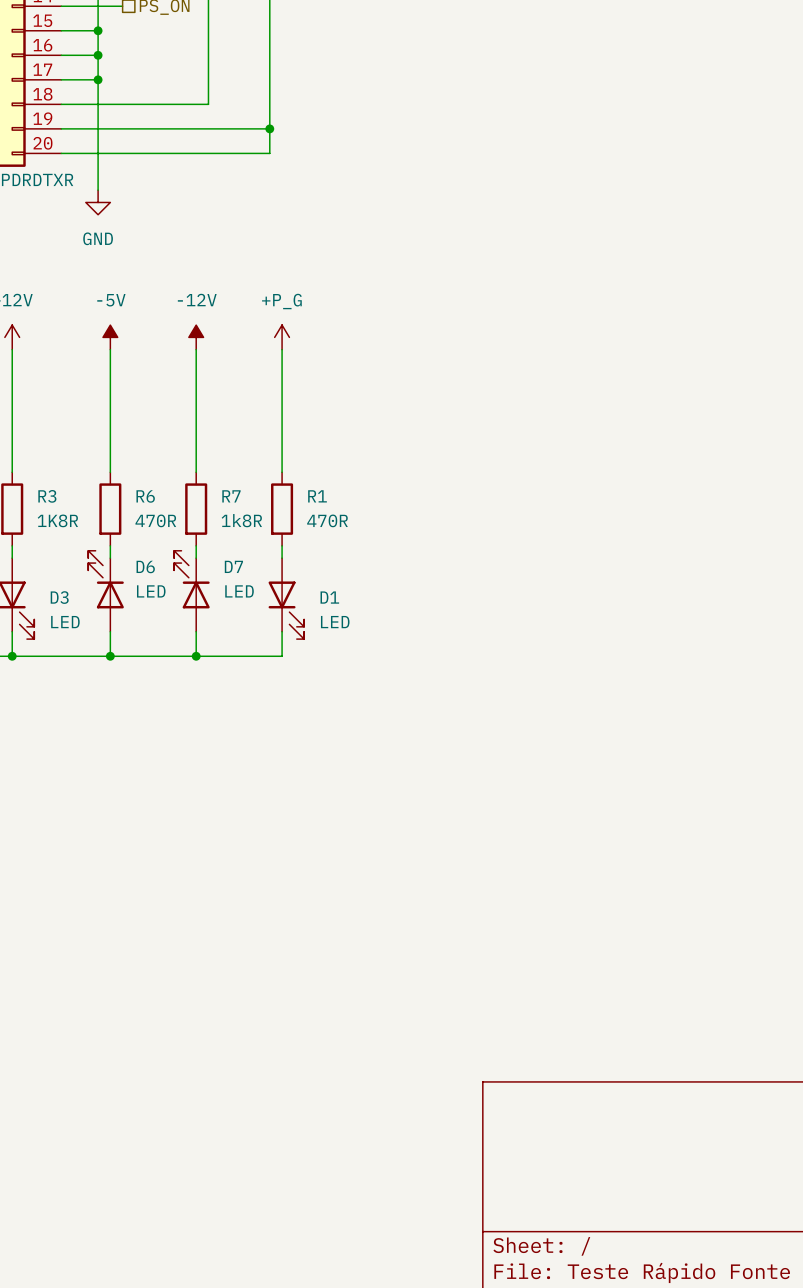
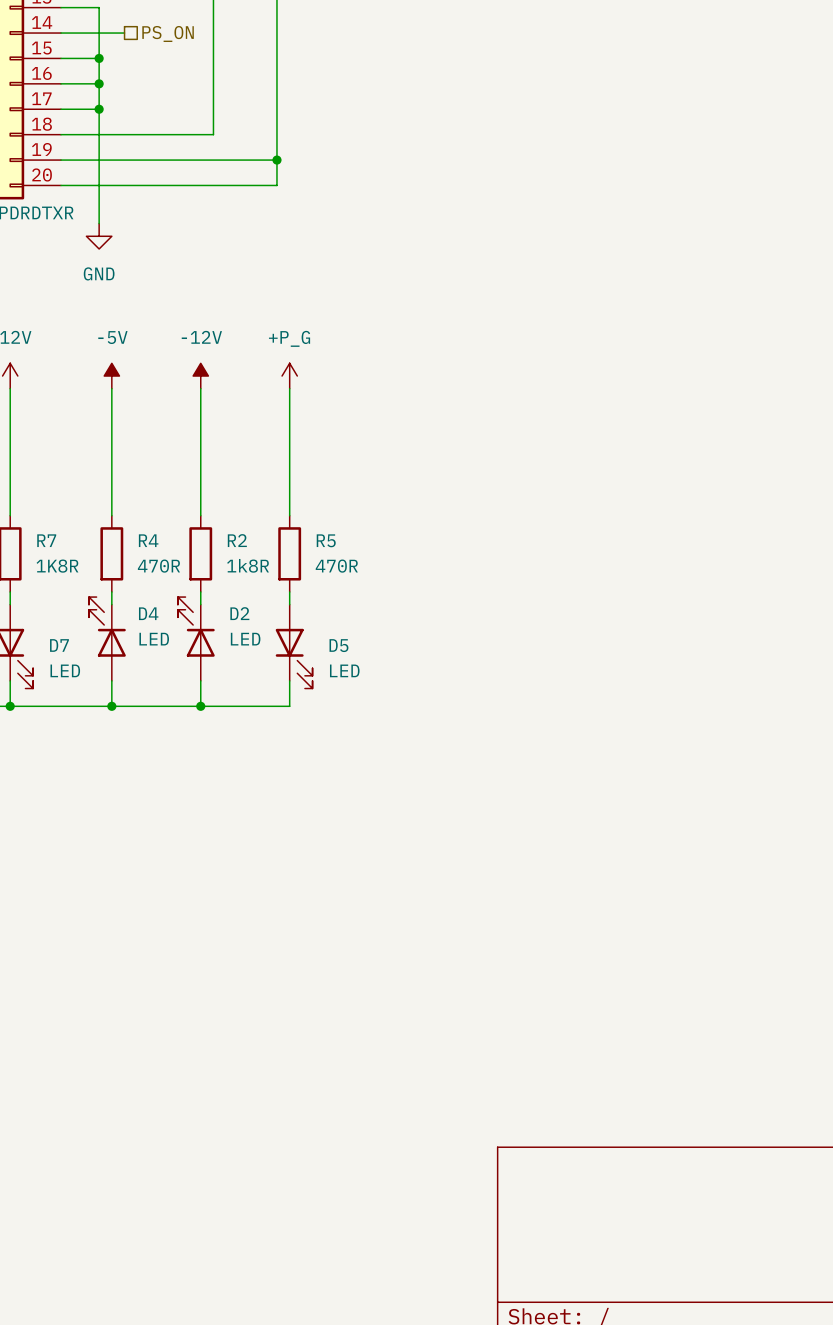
R3 name: R3 (47, 496) -> R7 (46, 540)
R6 name: R6 (145, 496) -> R4 (148, 540)
R7 name: R7 (231, 496) -> R2 (237, 540)
R1 name: R1 (317, 496) -> R5 (326, 540)
D6 name: D6 (145, 566) -> D4 (148, 613)
D7 name: D7 (233, 566) -> D2 (239, 613)
D3 name: D3 (59, 597) -> D7 (59, 645)
D1 name: D1 (329, 597) -> D5 (338, 645)

